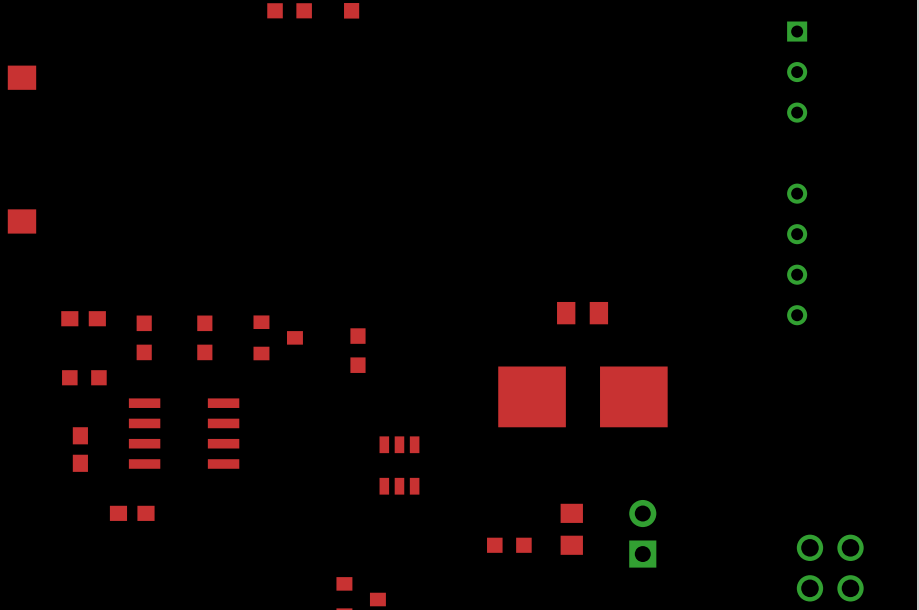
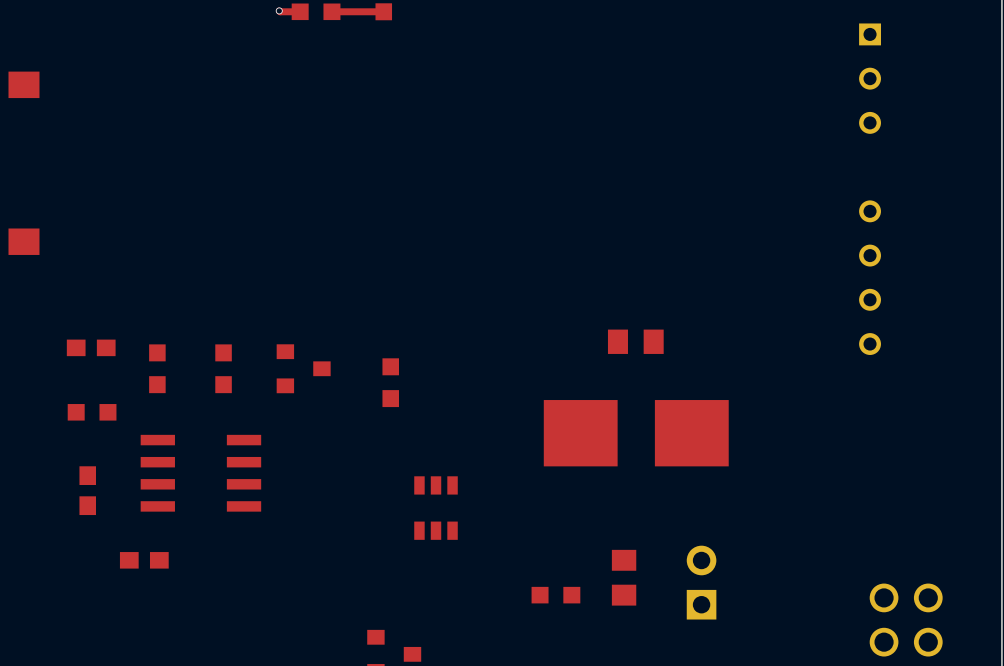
top track: none -> (279, 10) (300, 11)
via: none -> (279, 10)
top track: none -> (383, 11) (331, 11)

